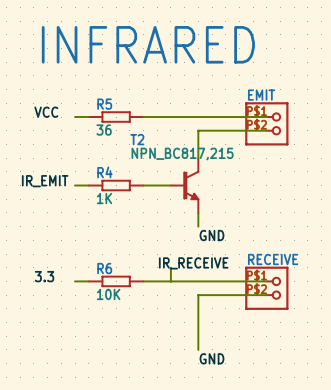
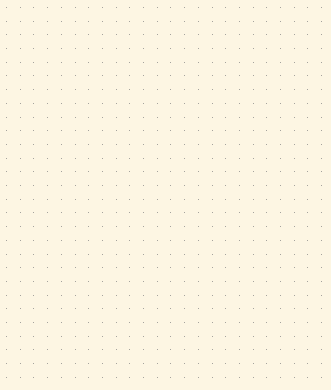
text: INFRARED (148, 44) -> none
label: VCC (46, 112) -> none
wire: (75, 117) (88, 117) -> none
R5: 36 (116, 117) -> none
wire: (143, 117) (266, 117) -> none
EMIT: (266, 123) -> none
wire: (266, 130) (198, 130) (198, 158) -> none
label: IR_EMIT (45, 181) -> none
wire: (75, 185) (88, 185) -> none
R4: 1K (116, 185) -> none
wire: (143, 185) (170, 185) -> none
T2: NPN_BC817,215 (184, 185) -> none
wire: (198, 212) (198, 226) -> none
label: GND (211, 235) -> none
label: IR_RECEIVE (193, 263) -> none
wire: (170, 267) (170, 281) -> none
label: 3.3 (44, 276) -> none
wire: (75, 281) (88, 281) -> none
R6: 10K (116, 281) -> none
wire: (143, 281) (266, 281) -> none
RECEIVE: (266, 288) -> none
wire: (266, 295) (198, 295) (198, 349) -> none
label: GND (211, 358) -> none

